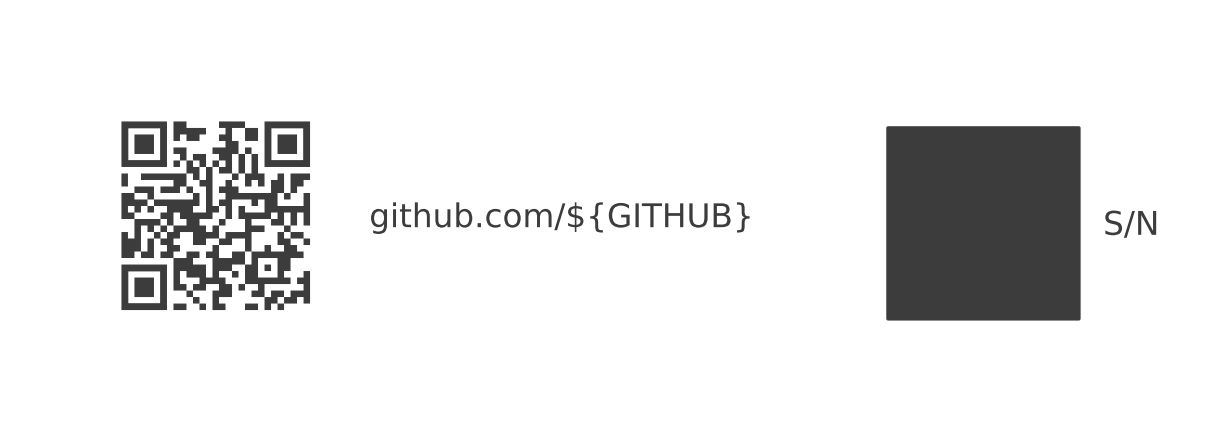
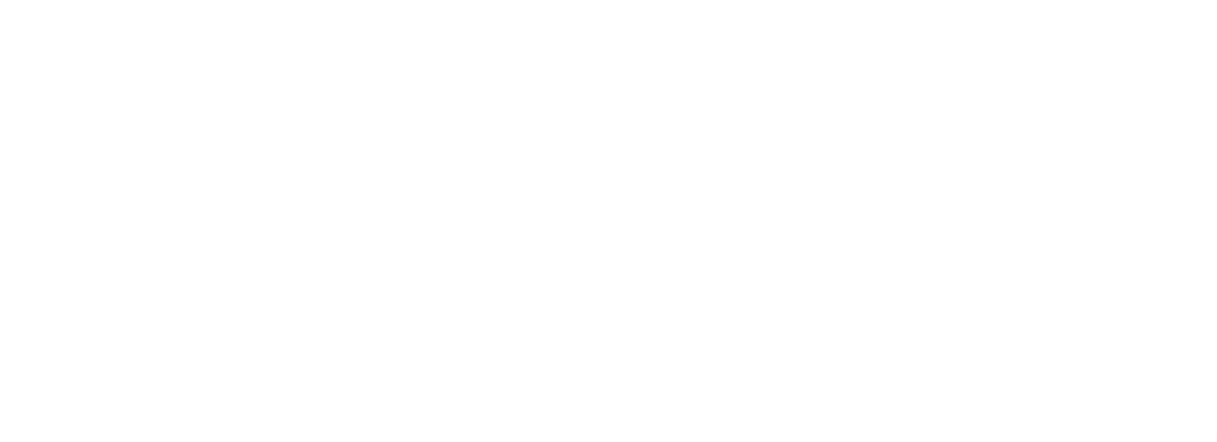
drawing: [121, 121, 311, 311] -> none
drawing: [886, 126, 1081, 321] -> none
text: github.com/${GITHUB} (560, 218) -> none
text: S/N (1130, 224) -> none

